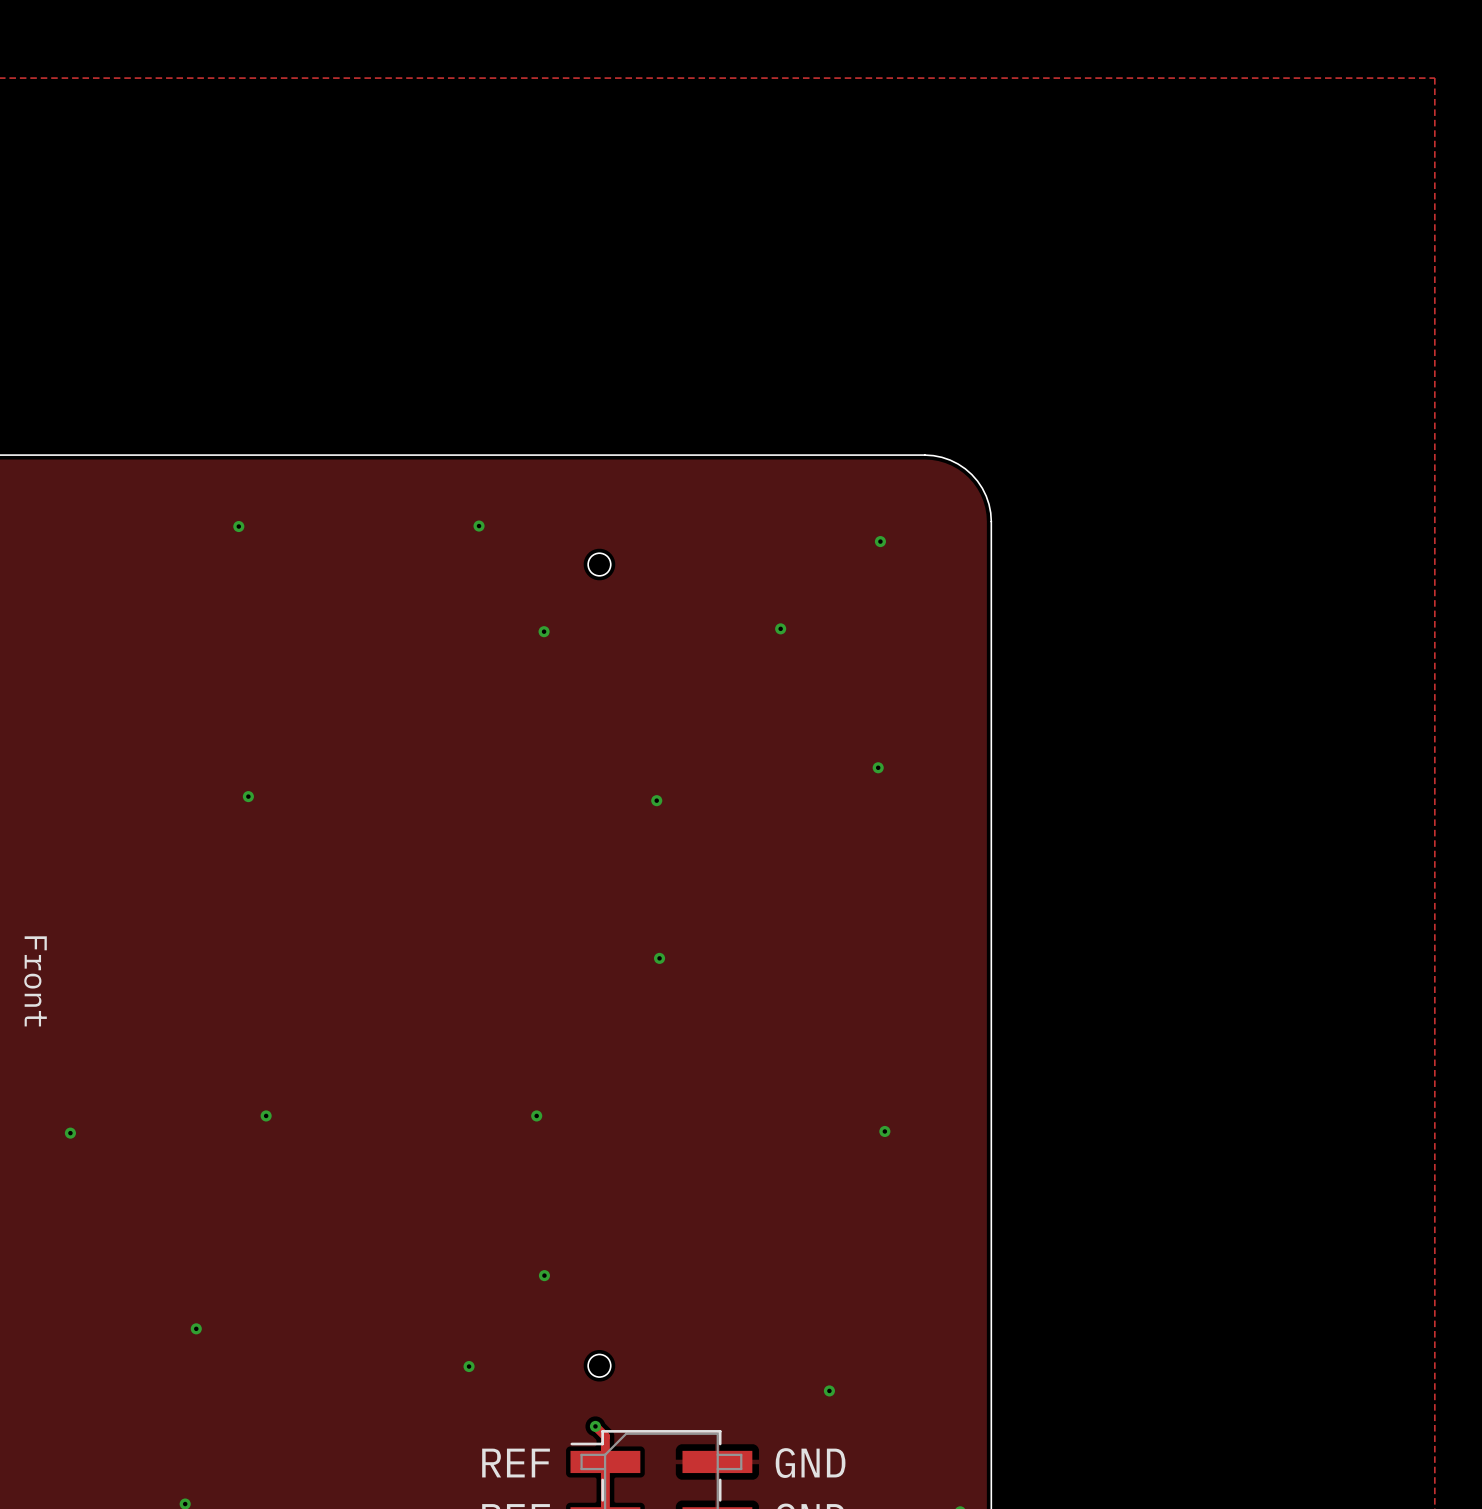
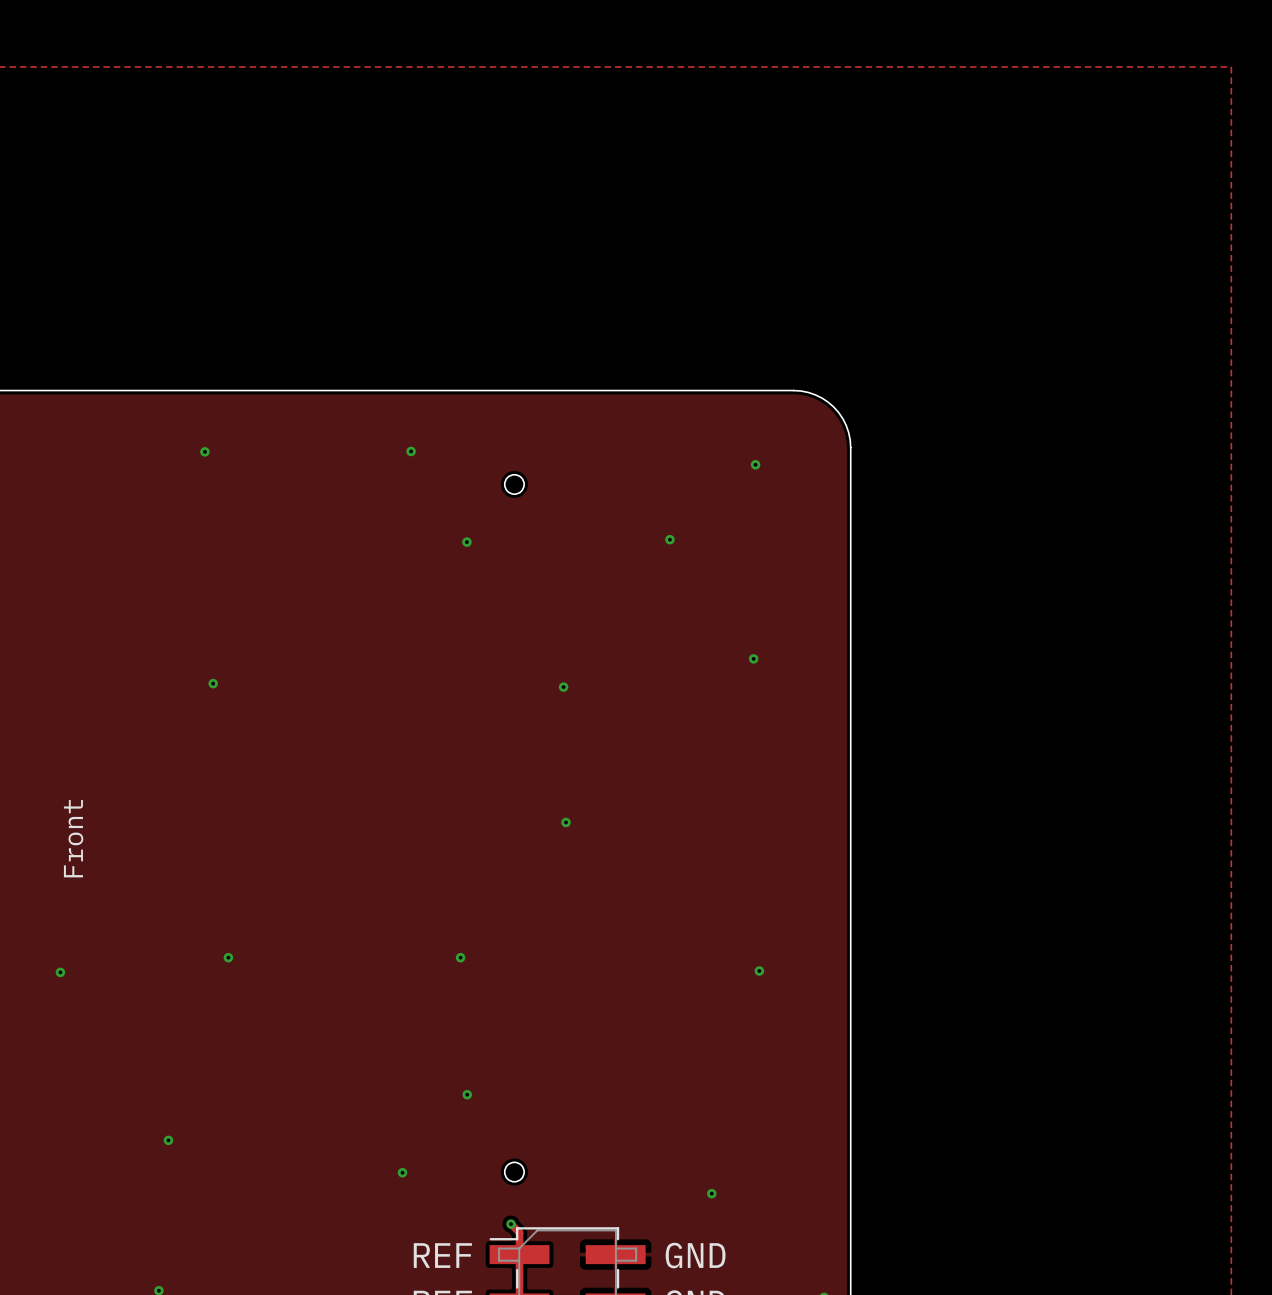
text rotation: 0° (35, 981) -> 180° (73, 838)

